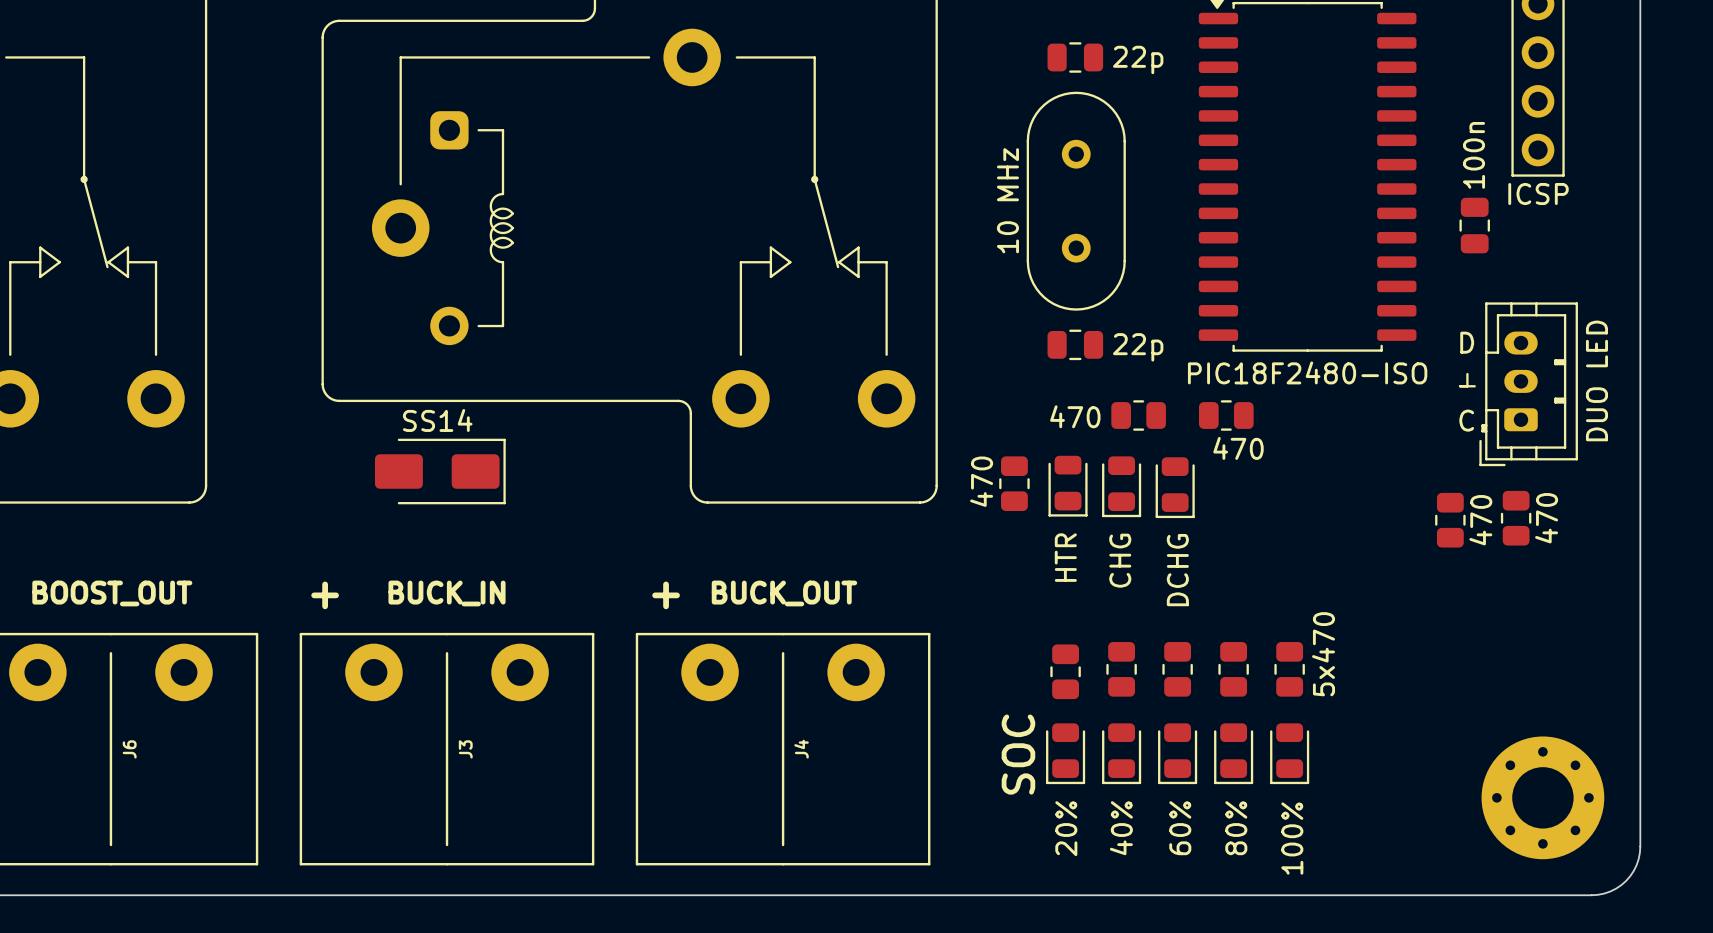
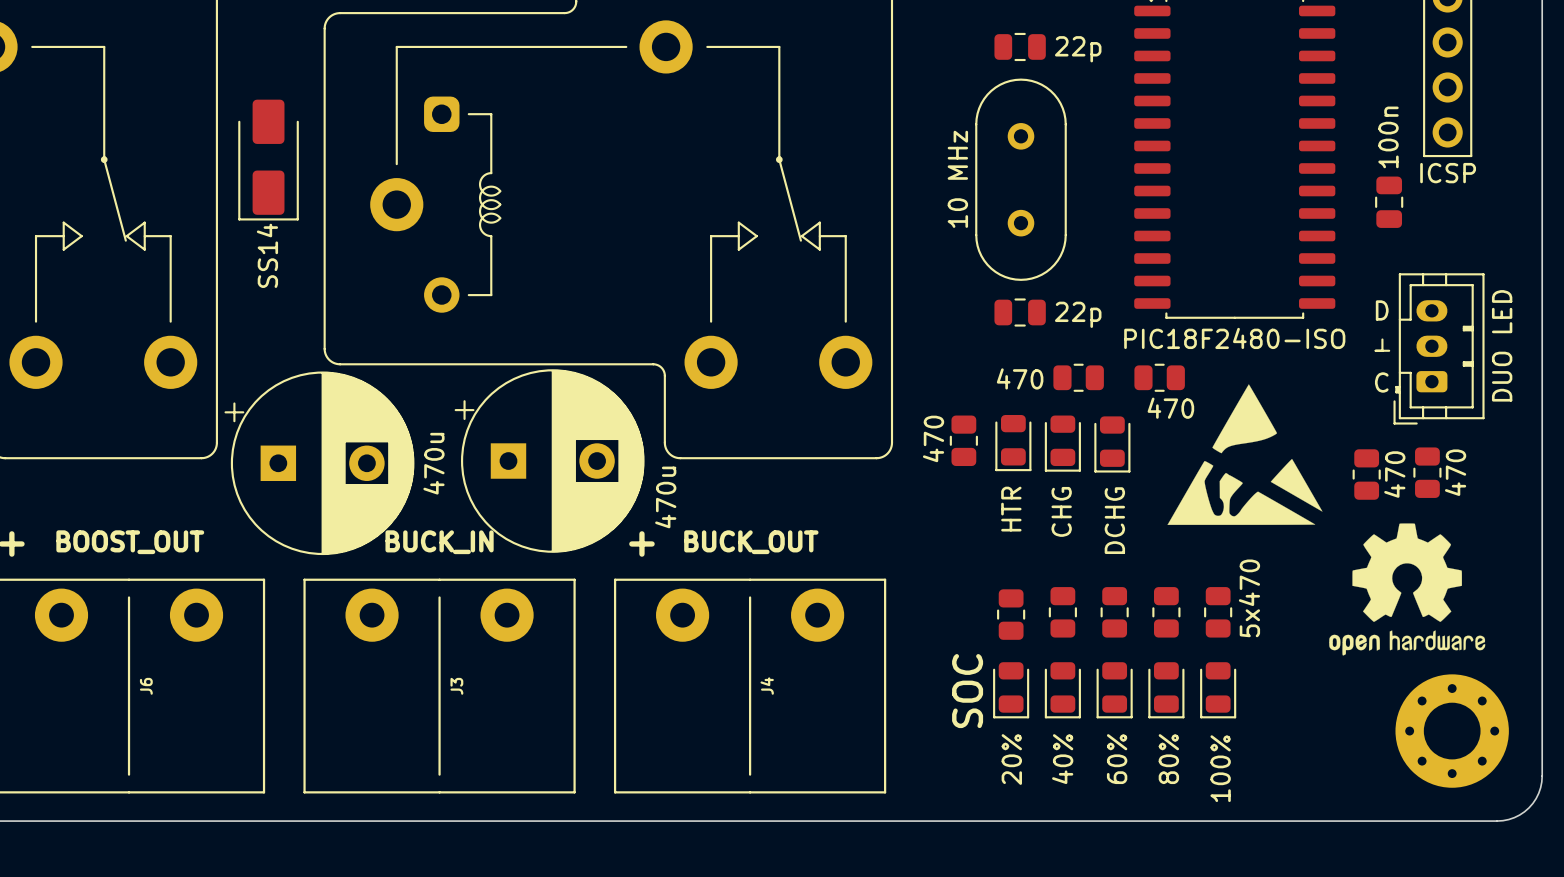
part value position: SS14 (437, 420) -> SS14 (267, 255)
drawing: none -> [1167, 384, 1486, 656]
part rotation: 0° (440, 471) -> 90° clockwise (268, 160)
part position: (440, 471) -> (268, 160)
part: none -> 470u (549, 461)
part: none -> 470u (319, 463)
text: + (325, 595) -> none

